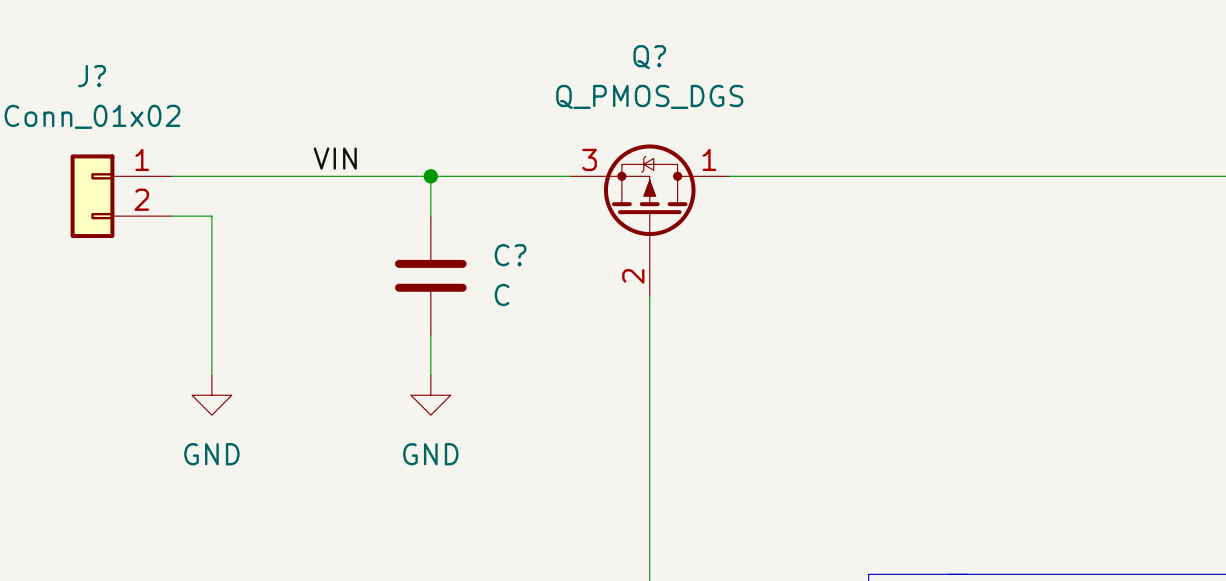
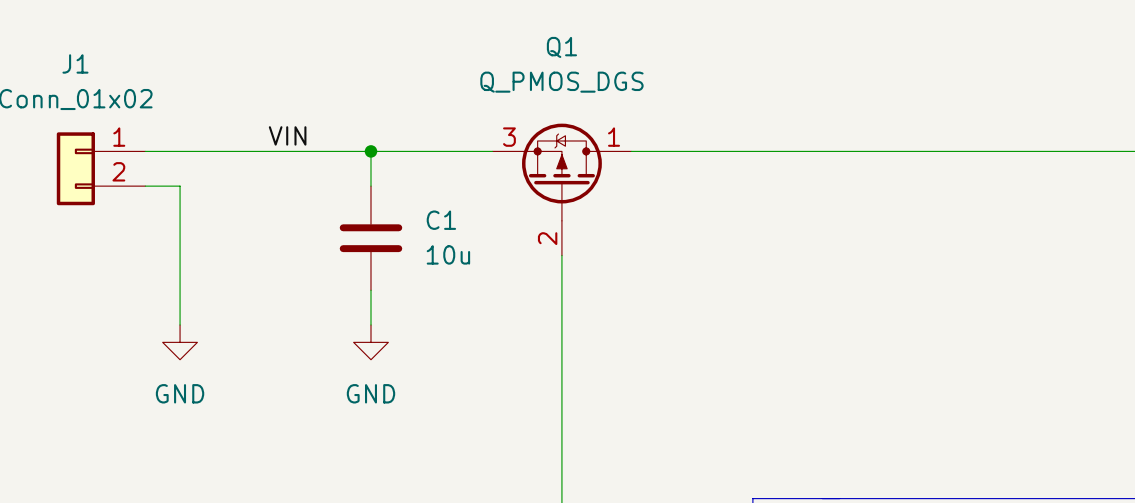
Q? name: Q? (649, 57) -> Q1 (561, 47)
J? name: J? (92, 76) -> J1 (75, 63)
C? name: C? (510, 255) -> C1 (441, 220)
C? value: C (502, 294) -> 10u (448, 254)

